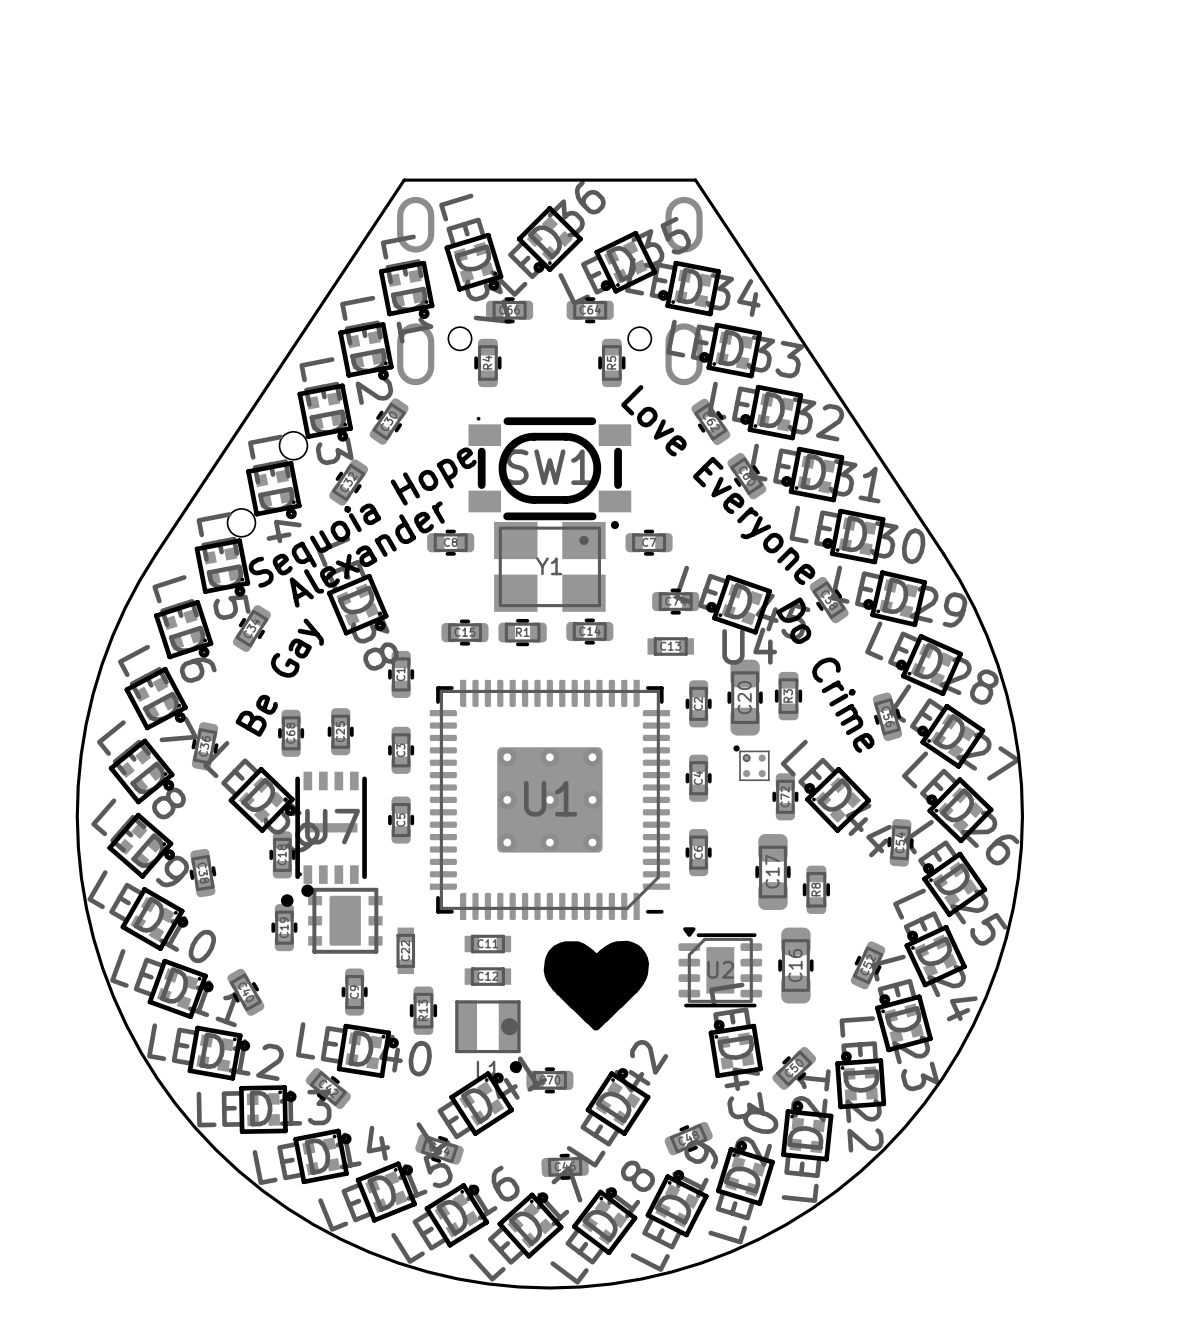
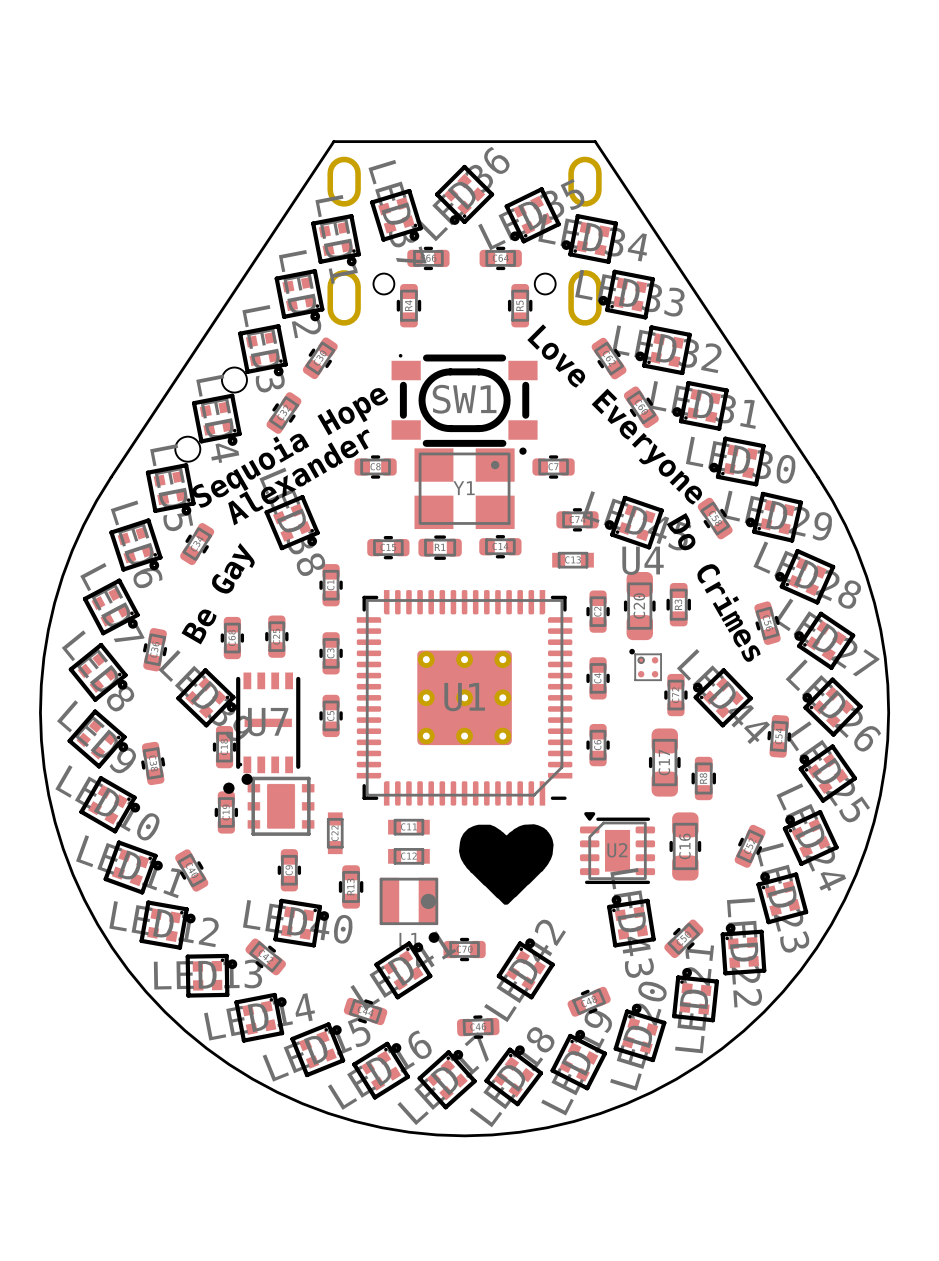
text: Do Crime (825, 675) -> Do Crimes (713, 587)

